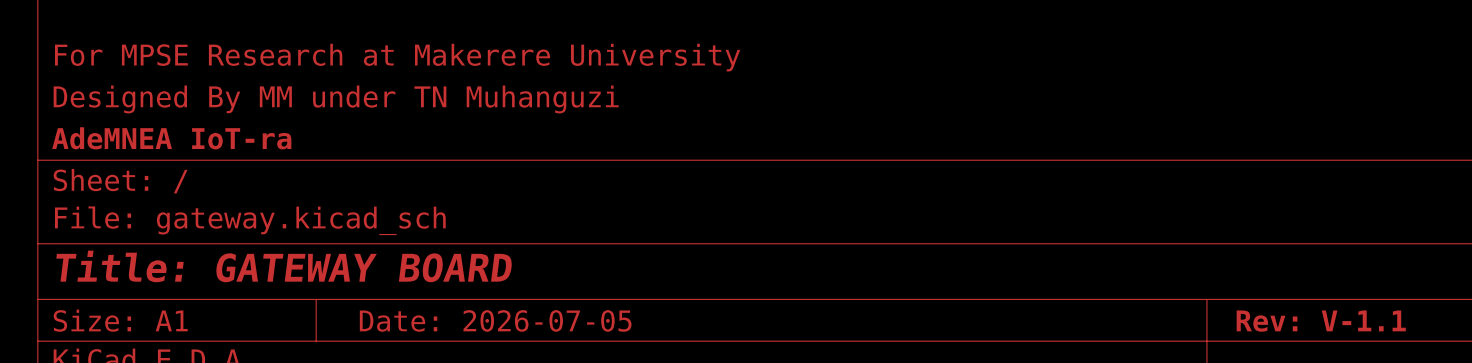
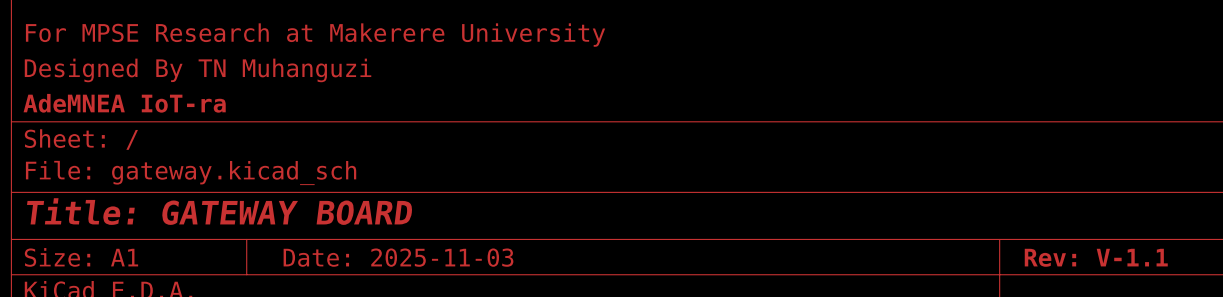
title block: Designed By MM under TN Muhanguzi (336, 99) -> Designed By TN Muhanguzi (198, 70)
title block: Date: 2026-07-05 (495, 320) -> Date: 2025-11-03 (398, 257)

